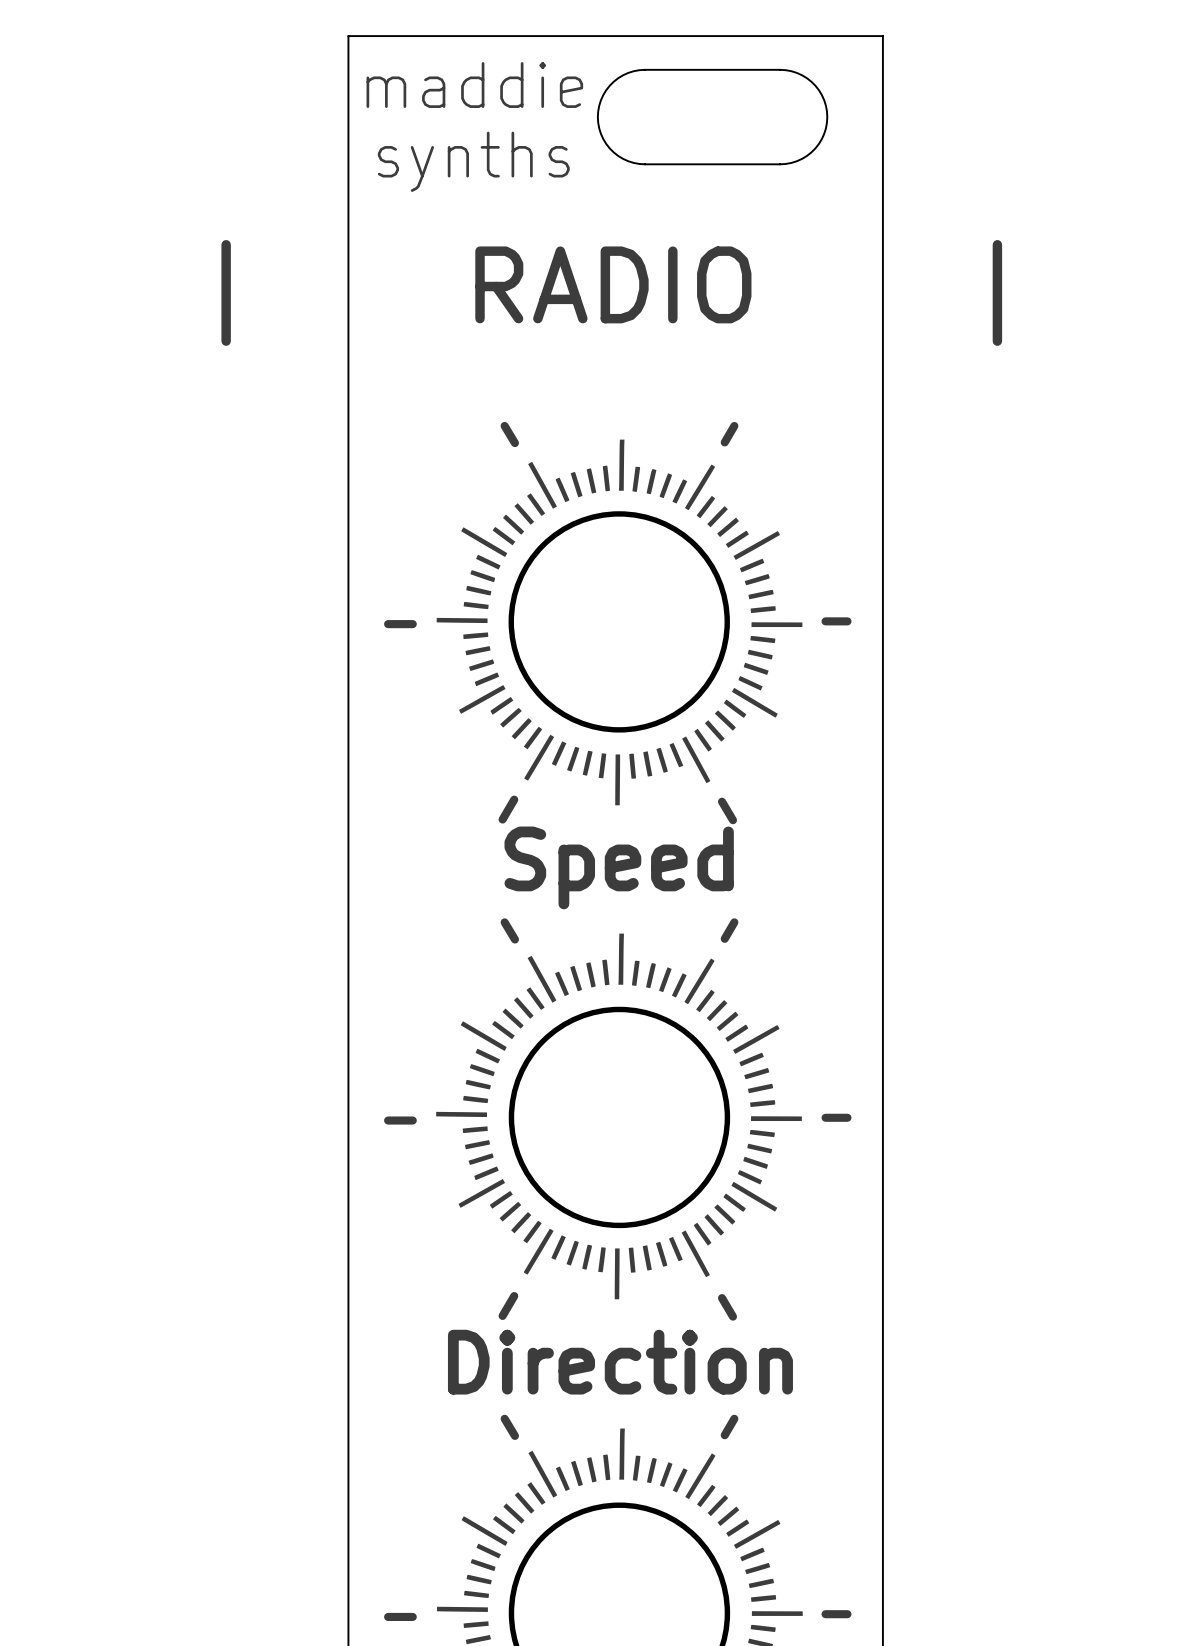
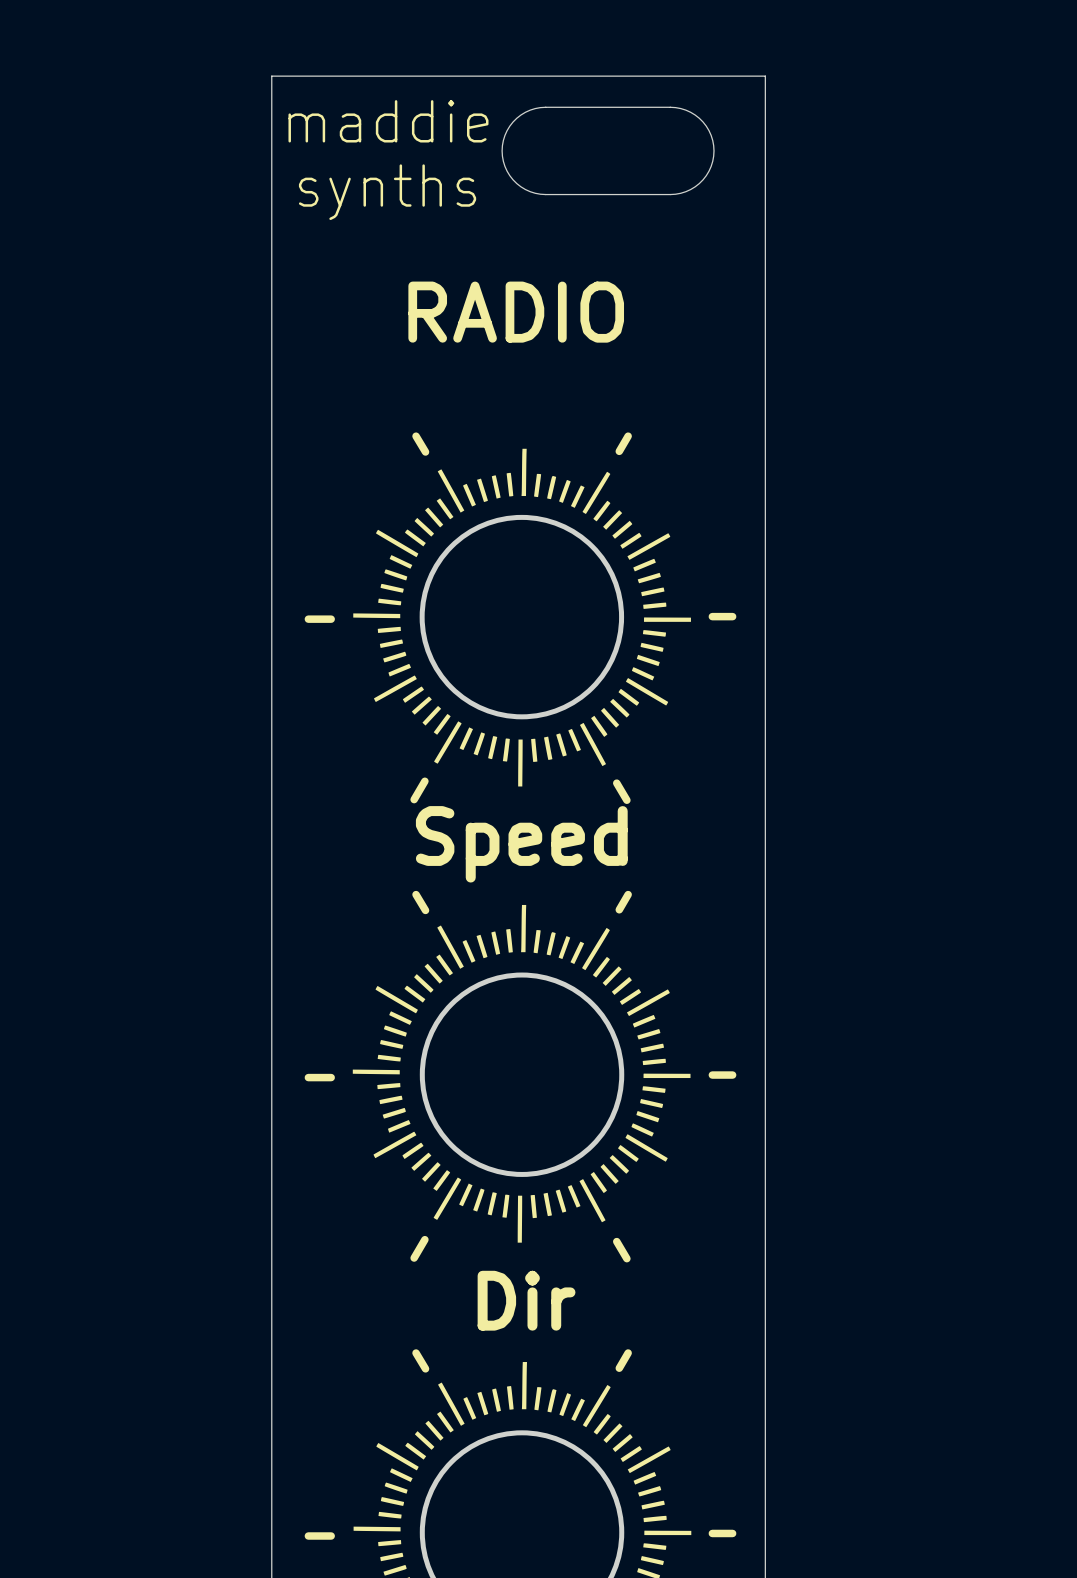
text: | RADIO | (611, 292) -> RADIO (516, 312)
text: Direction (620, 1362) -> Dir (526, 1300)

